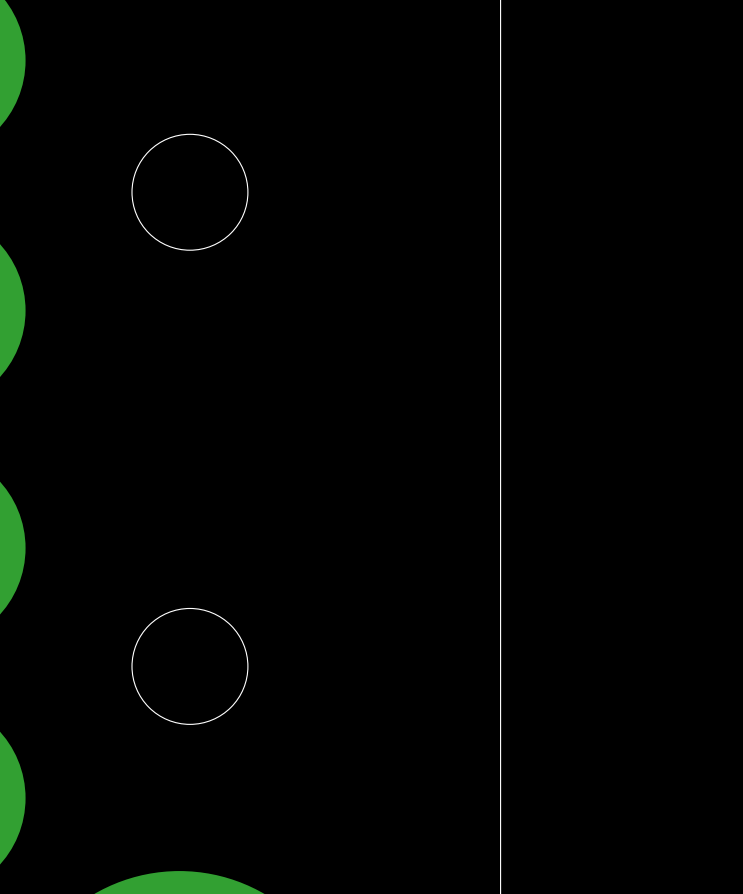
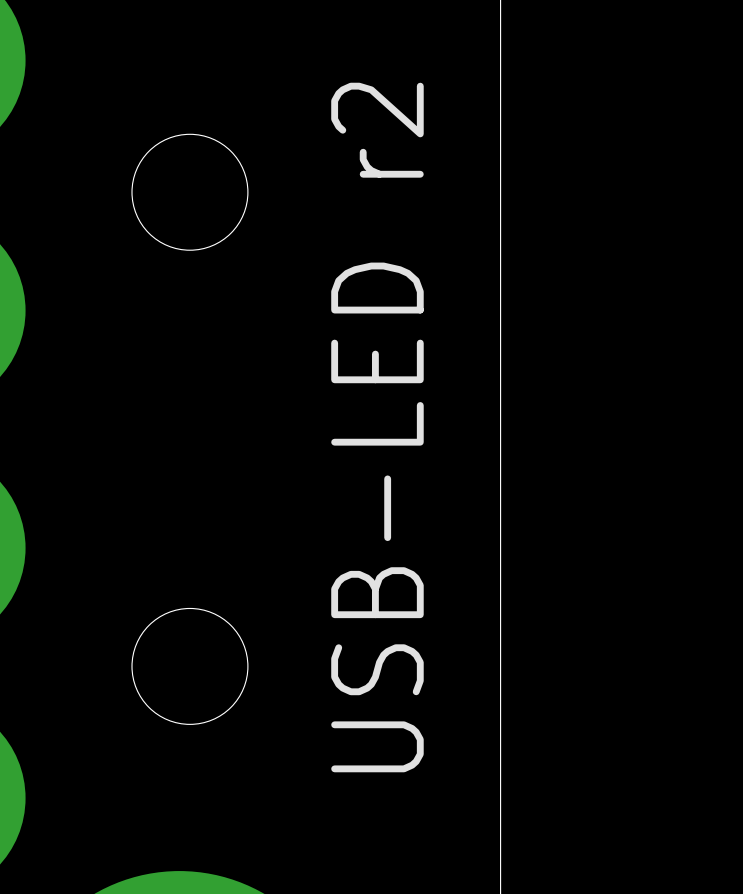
text: none -> USB-LED r2 (377, 427)

